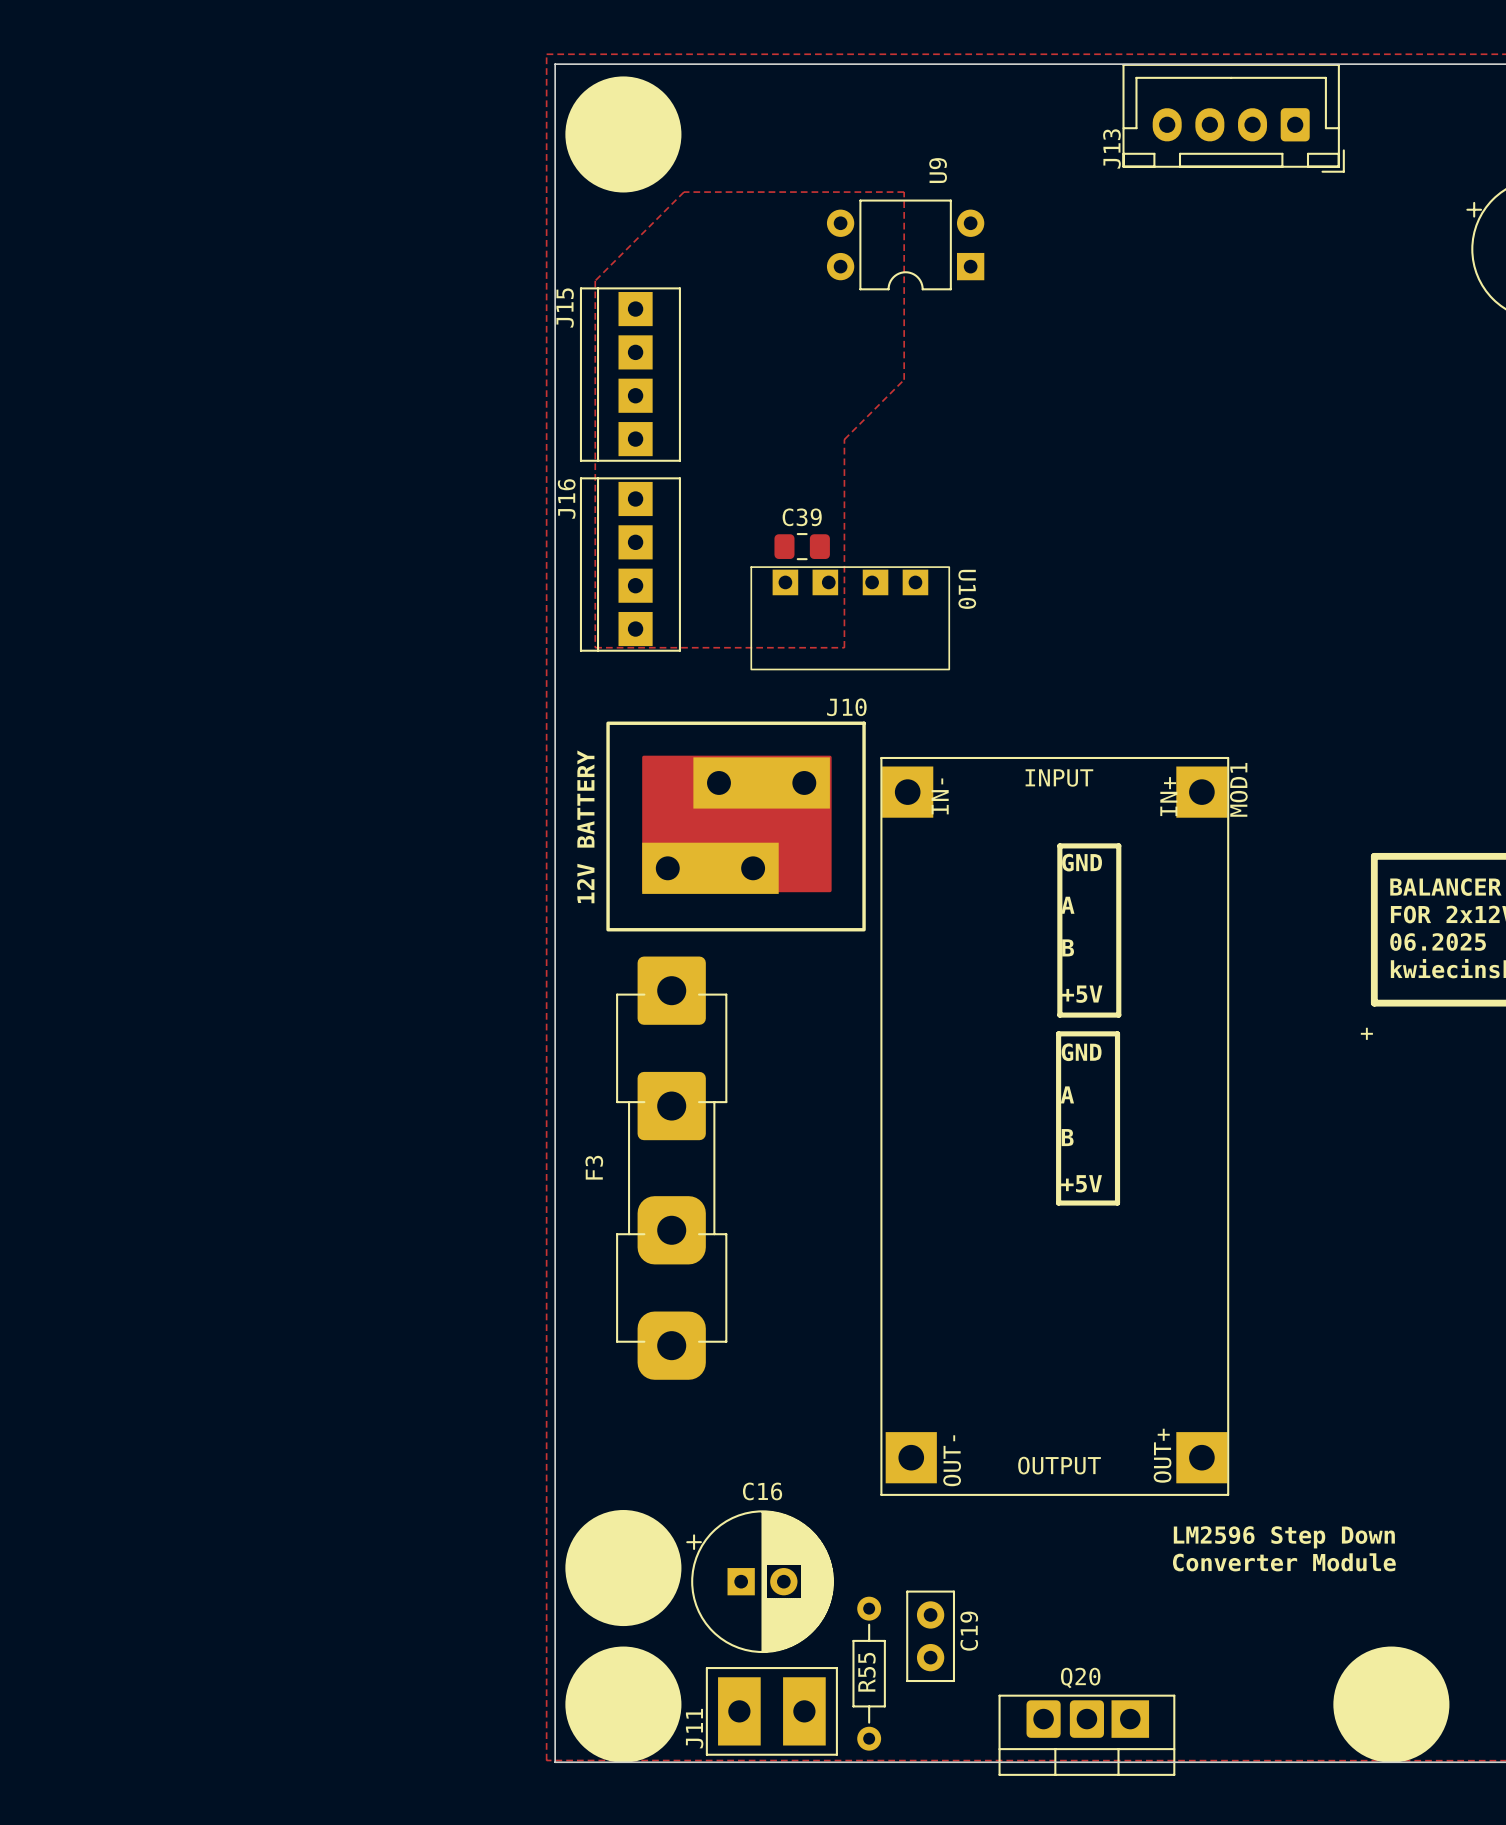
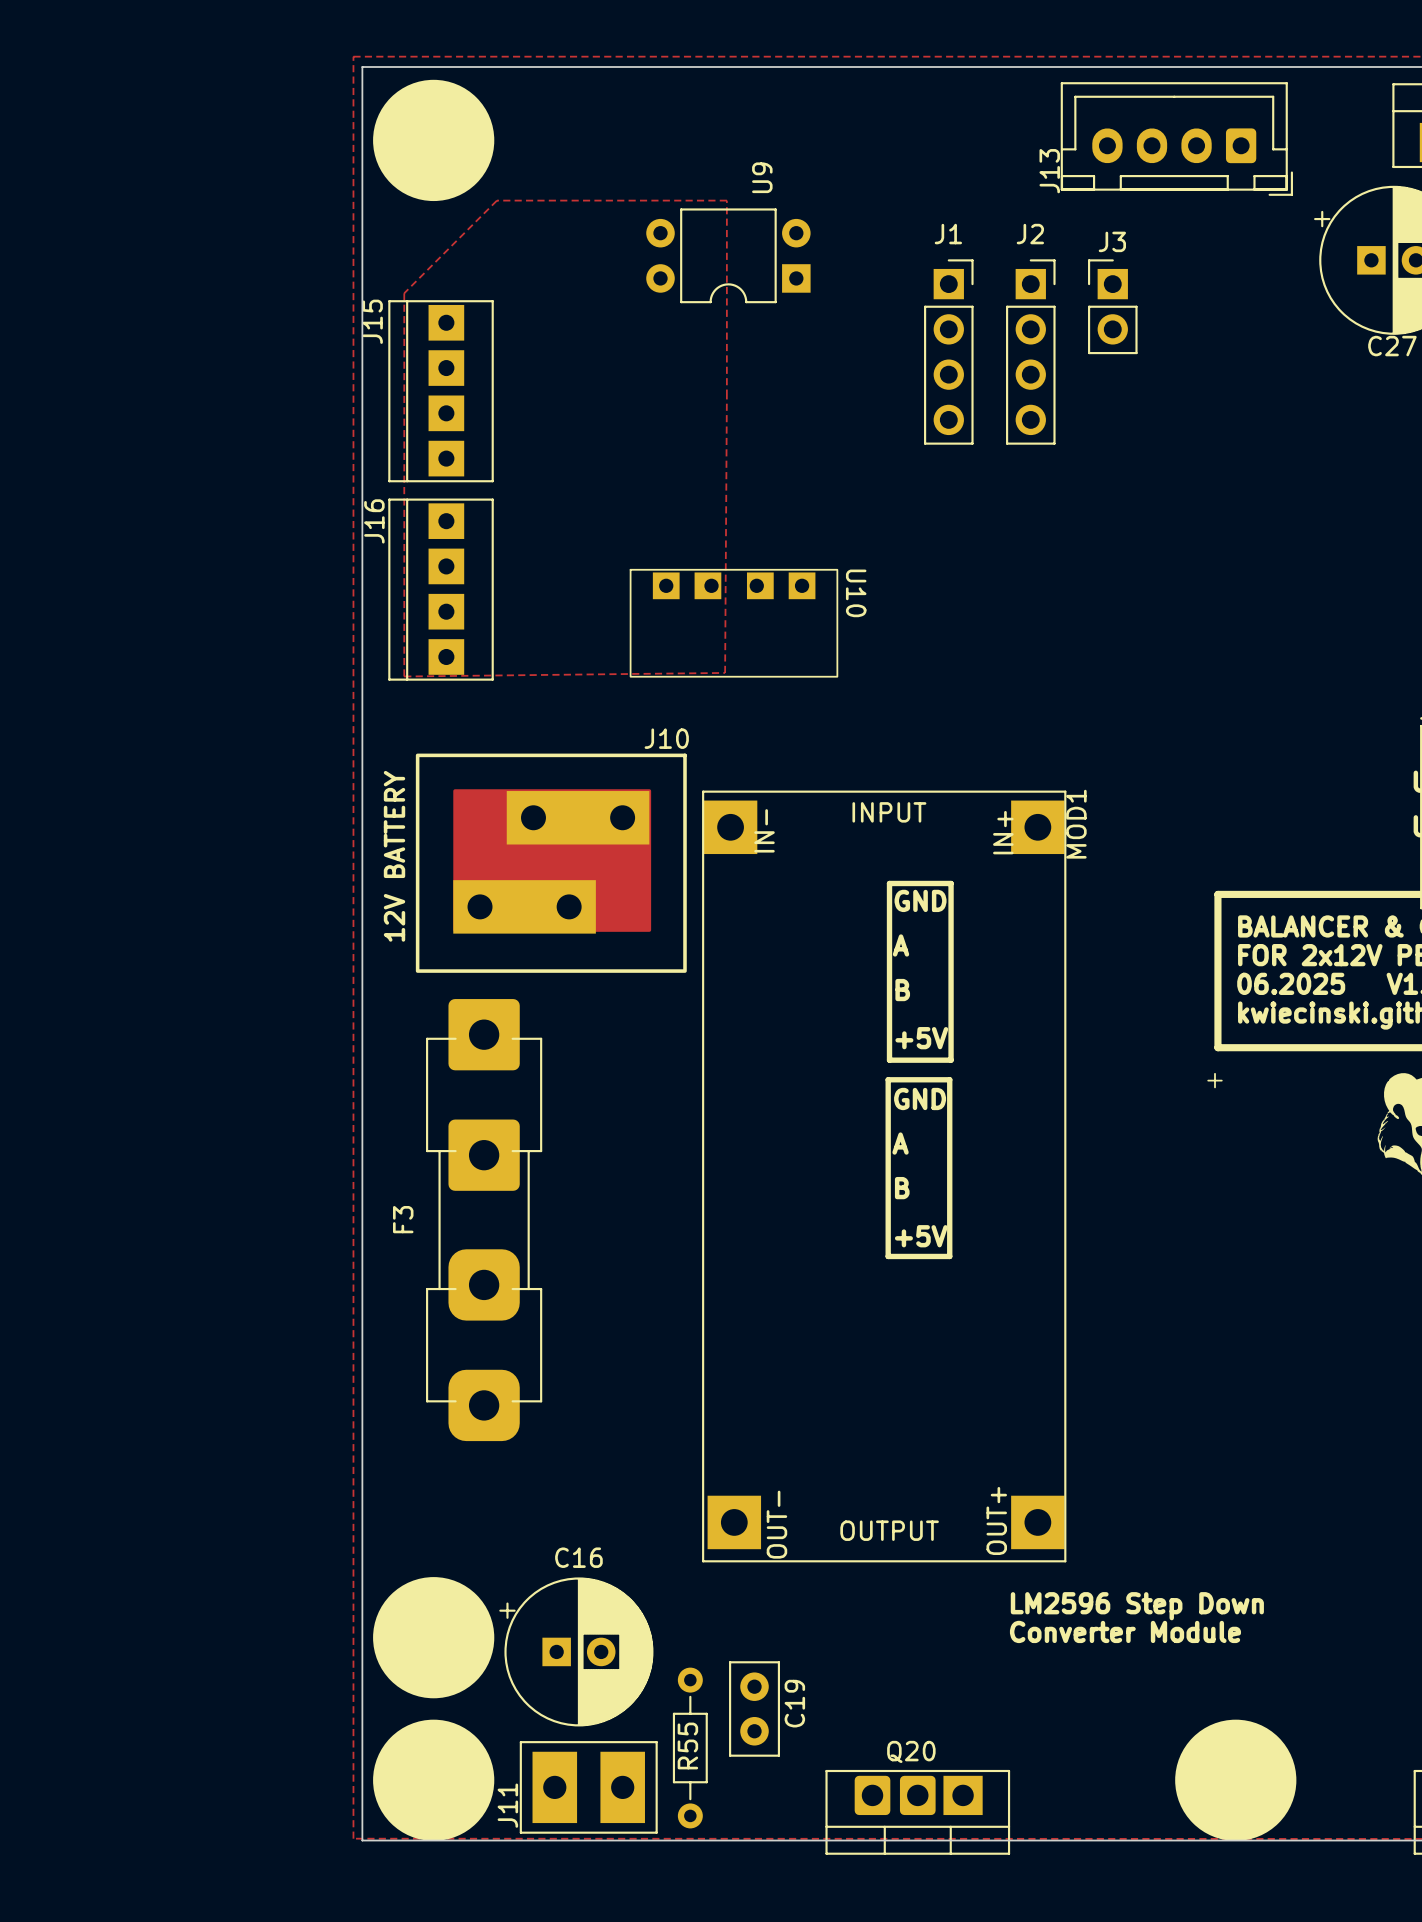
J13 position: (1233, 118) -> (1176, 139)
J3: none -> (1112, 306)
J1: none -> (948, 352)
J2: none -> (1030, 352)
zone outline: (904, 379) (844, 439) (844, 647) (595, 647) -> (726, 396) (725, 672) (404, 676)
C39: (802, 546) -> none
U10 position: (850, 618) -> (733, 623)

